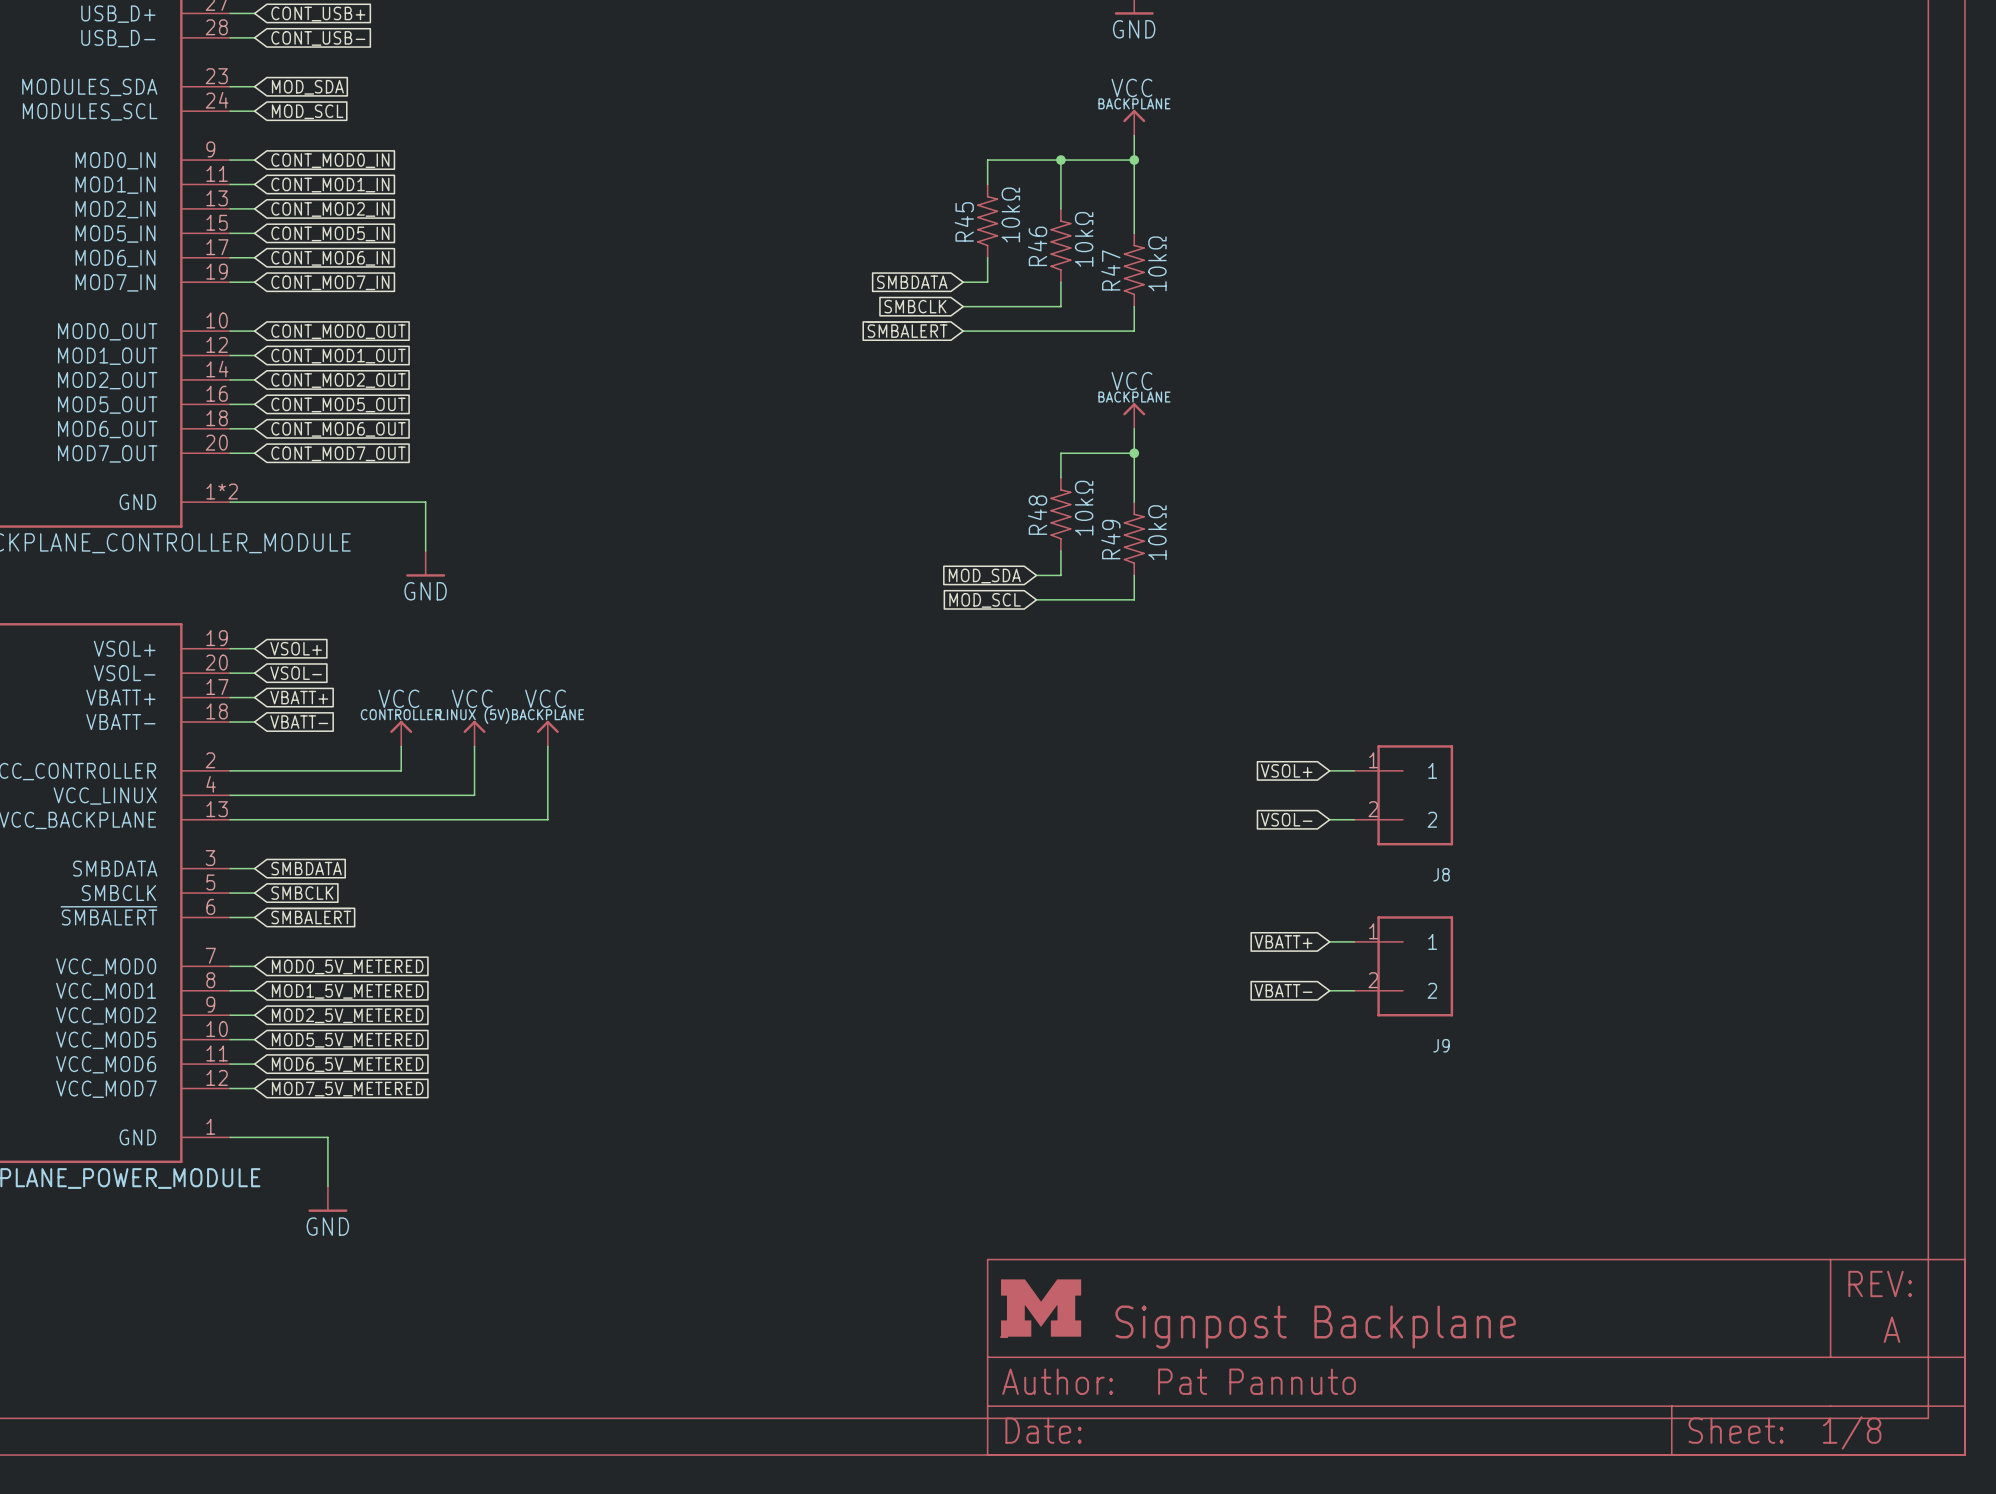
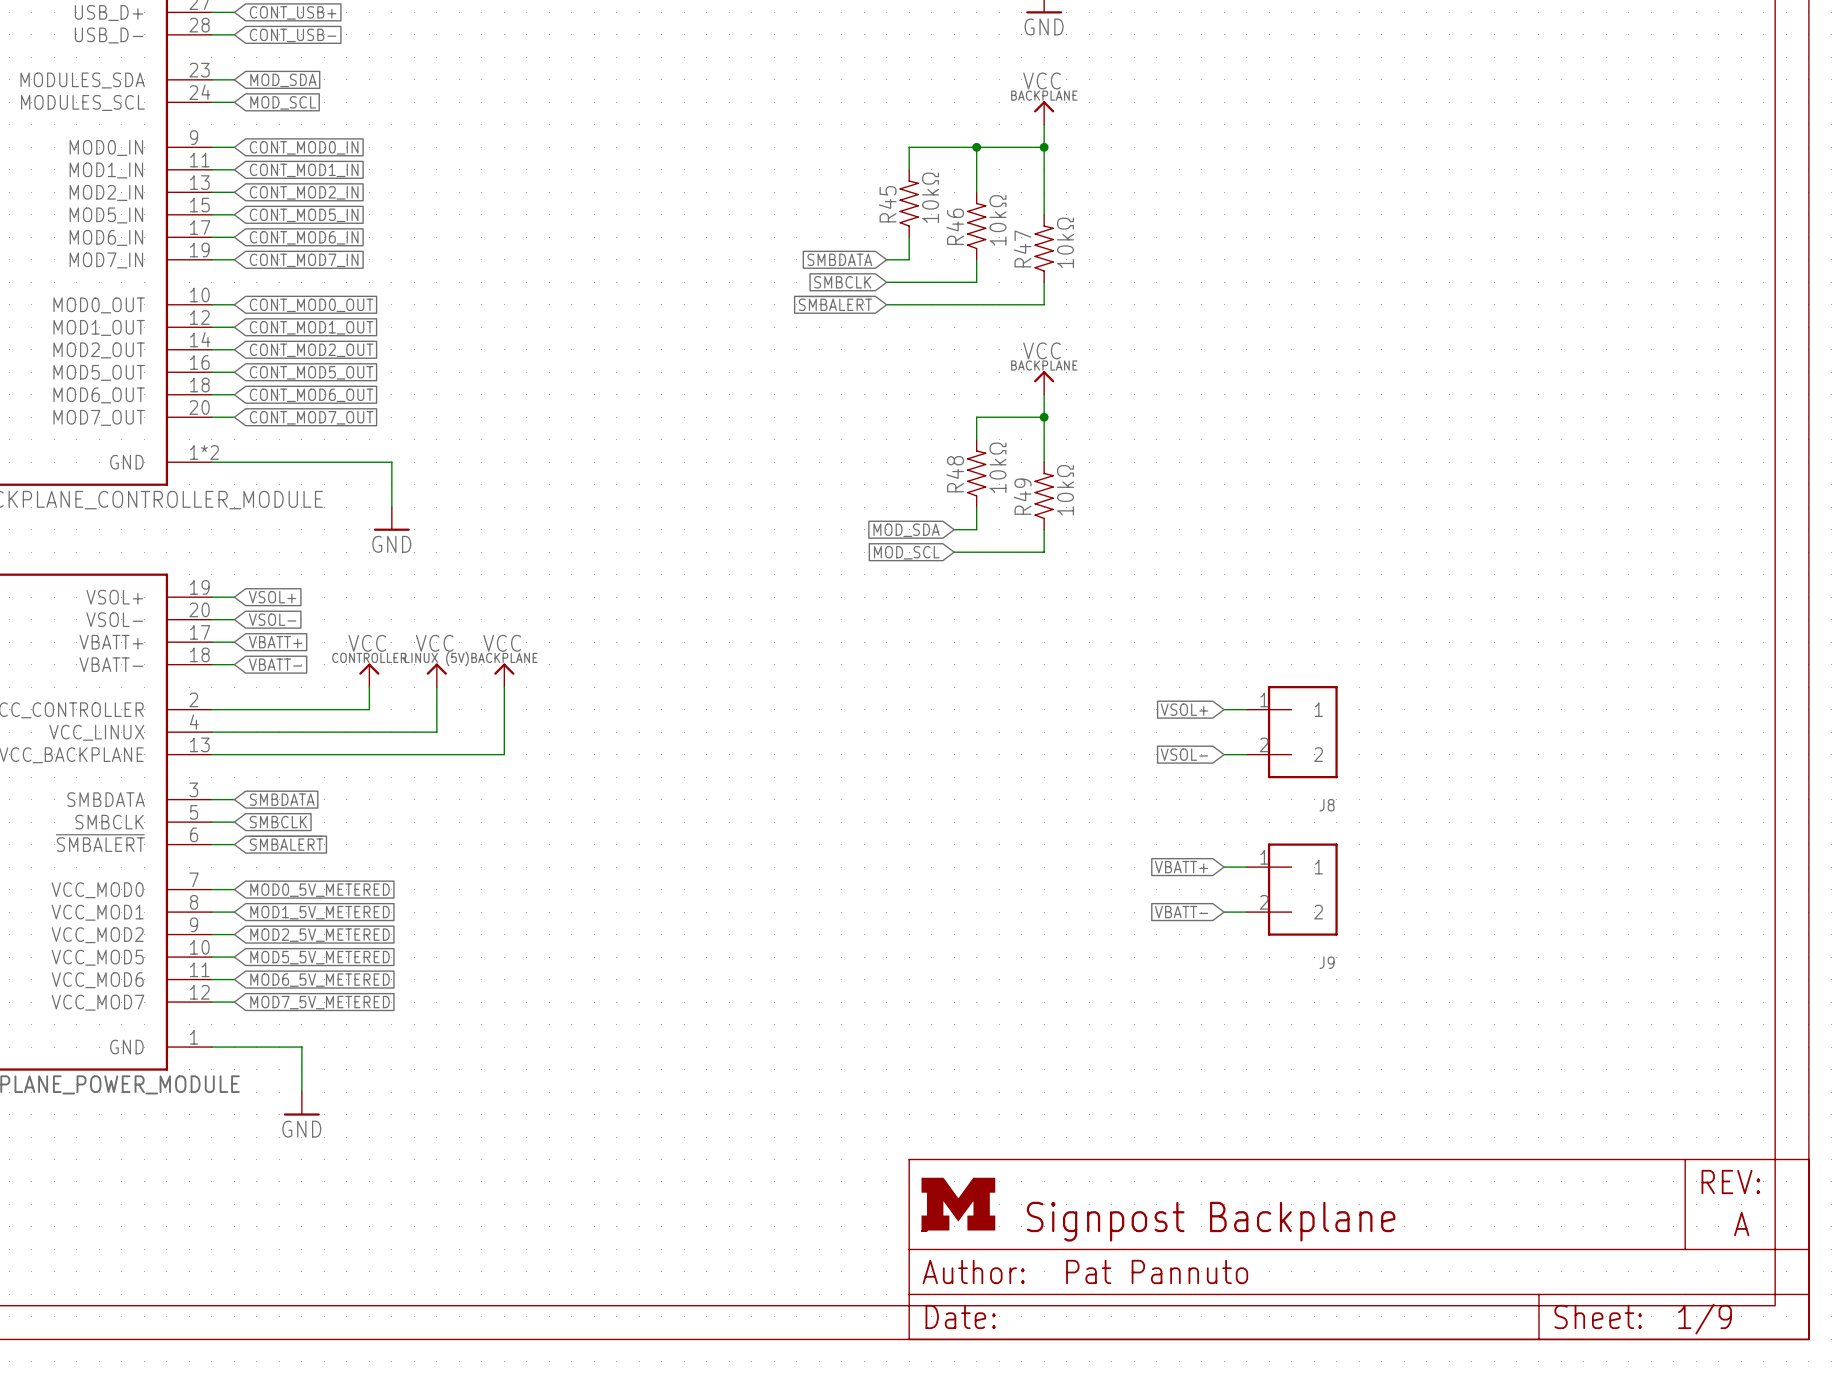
part text: 1/8 (1852, 1432) -> 1/9 (1705, 1319)

